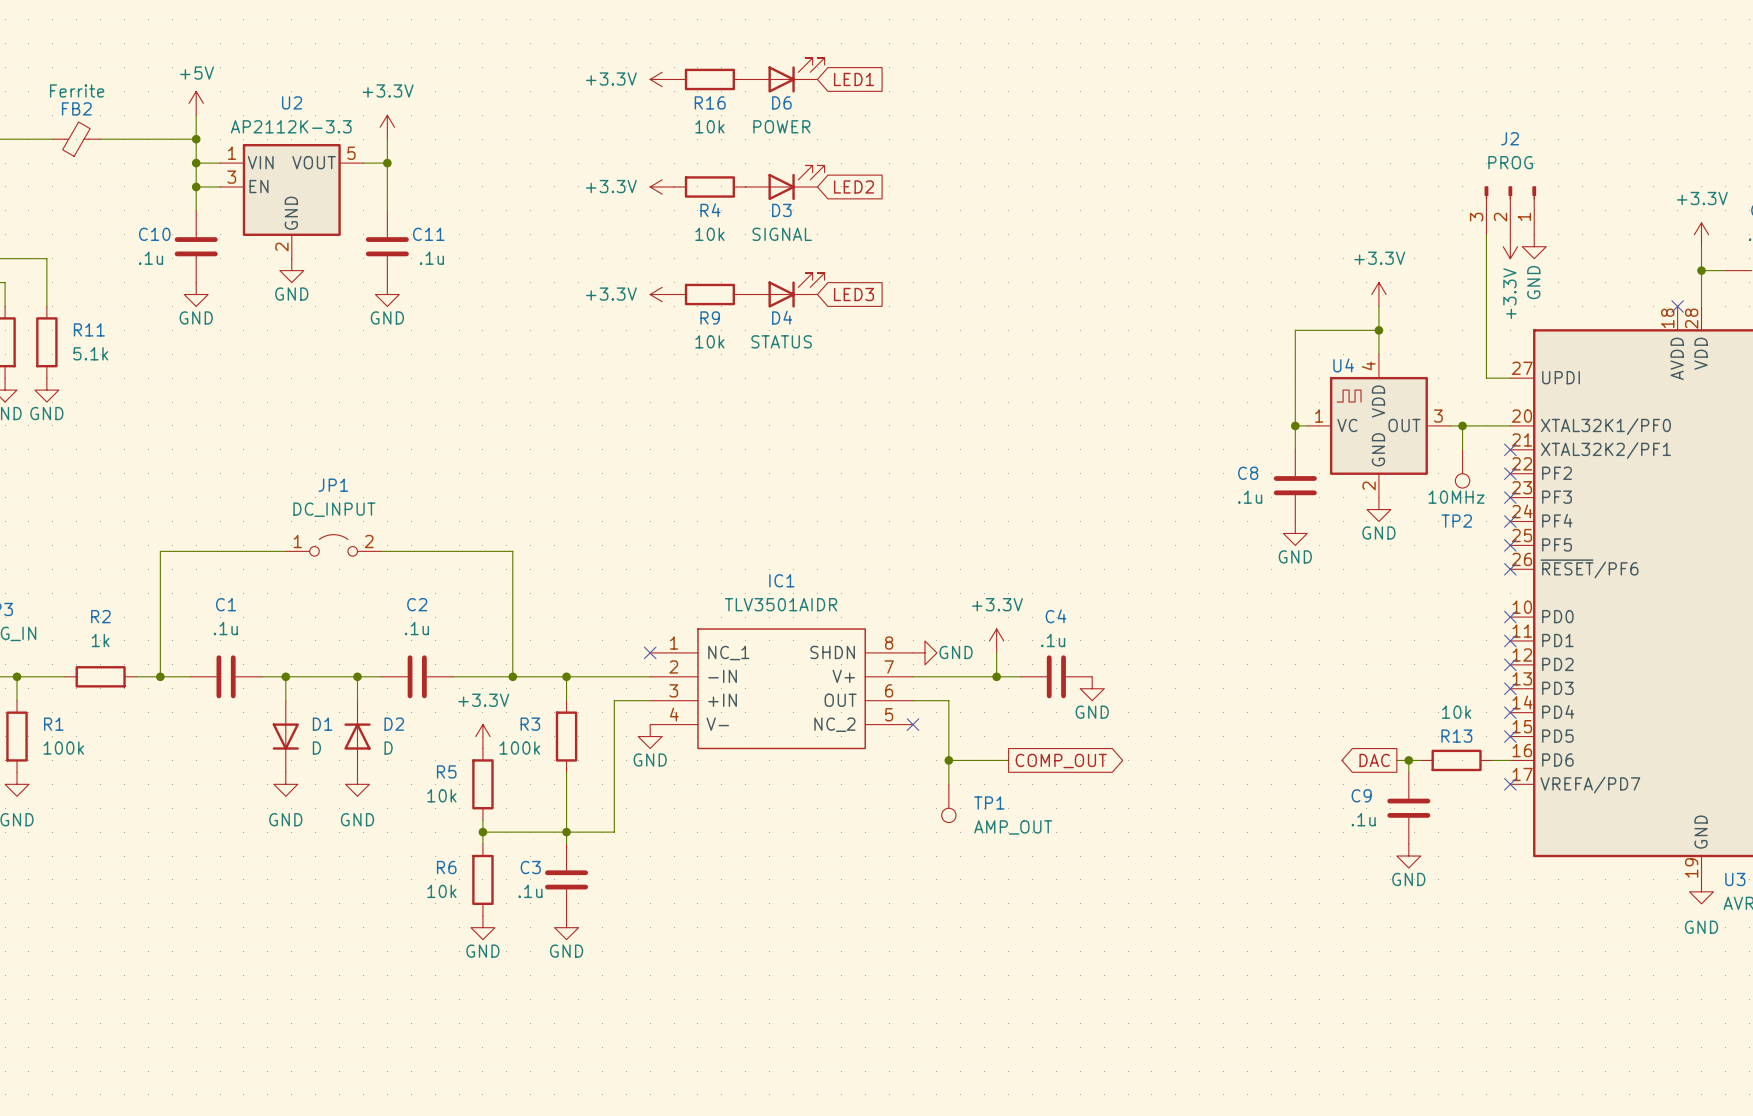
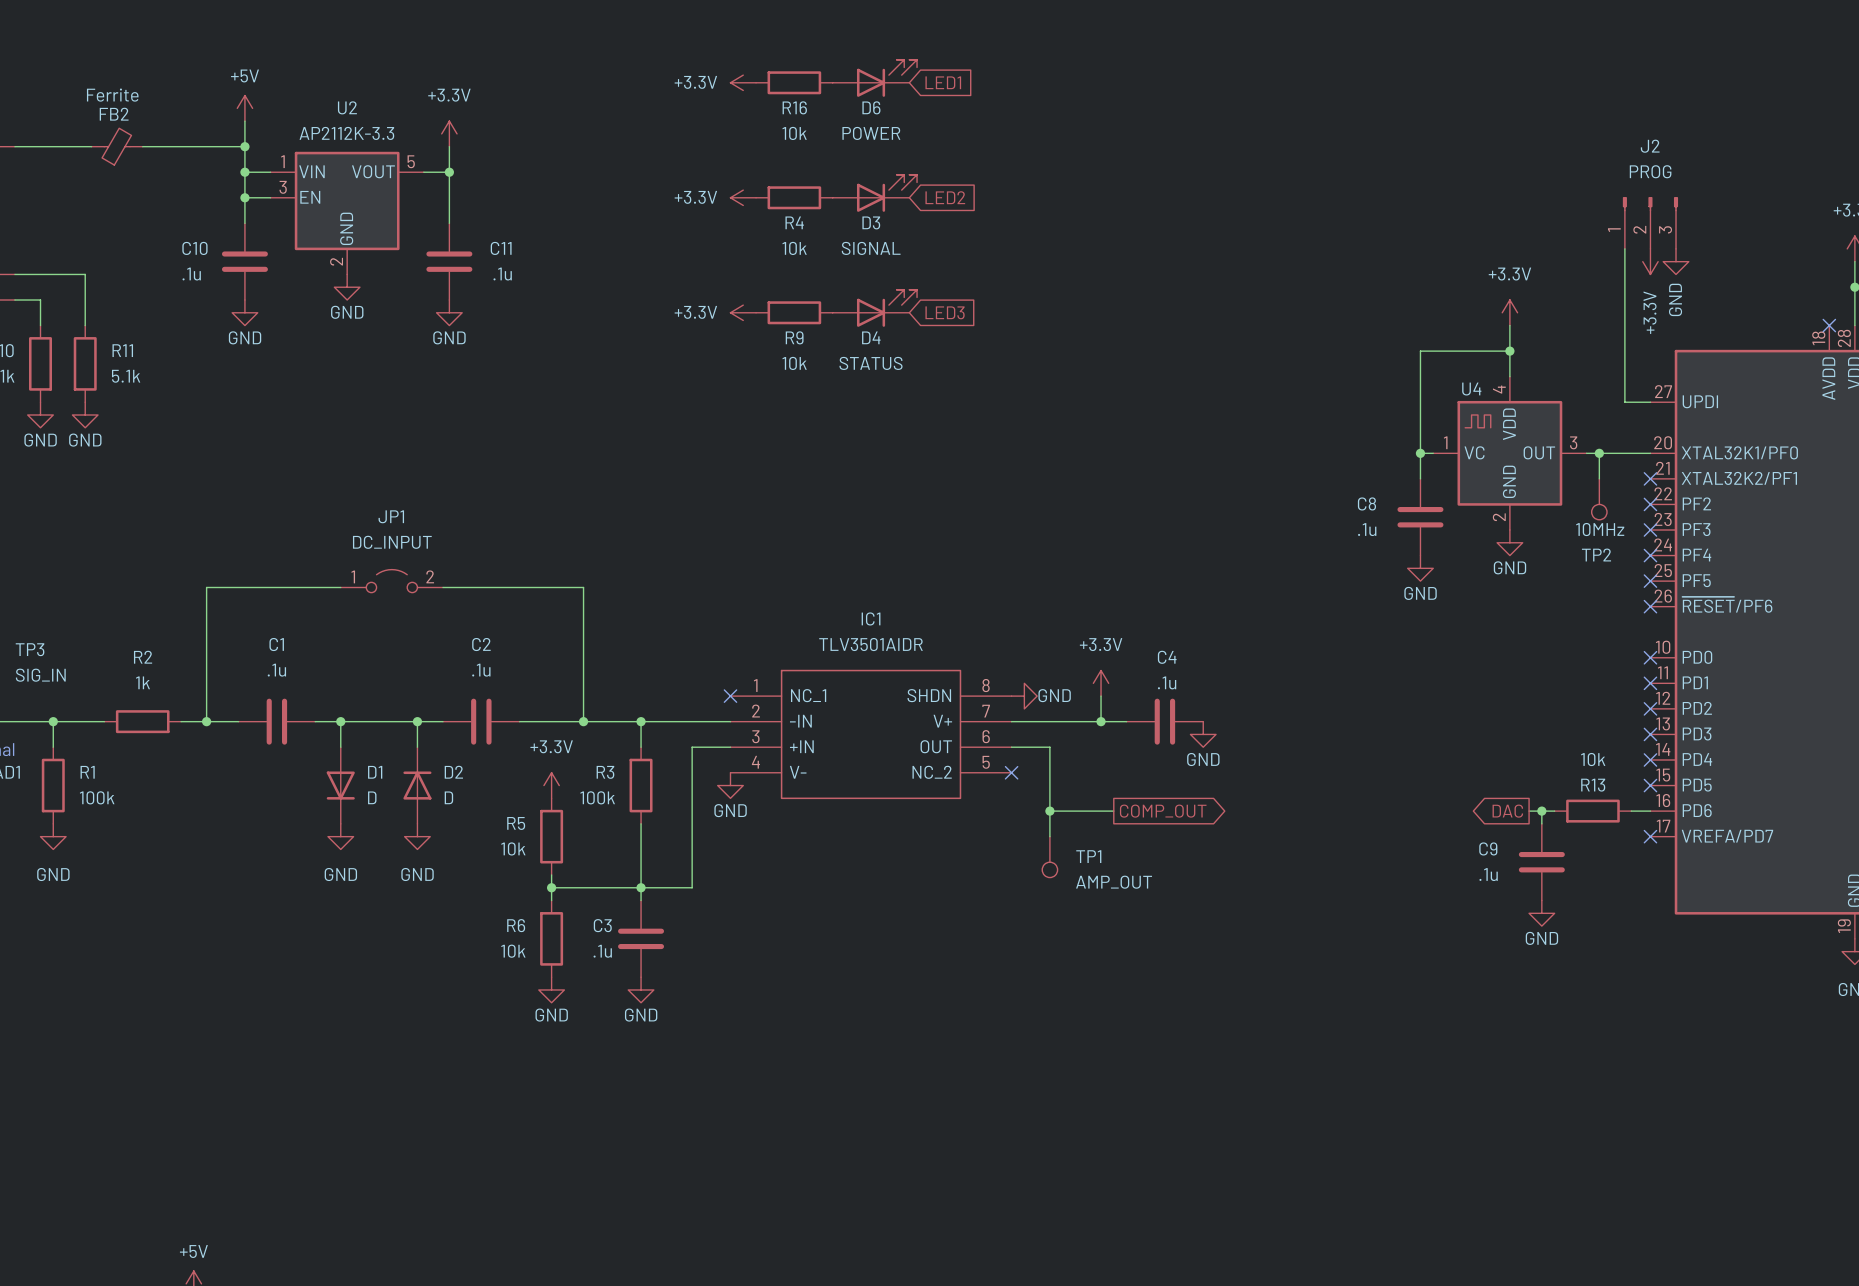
J2 flip: as is (1510, 192) -> left-right (1650, 204)

